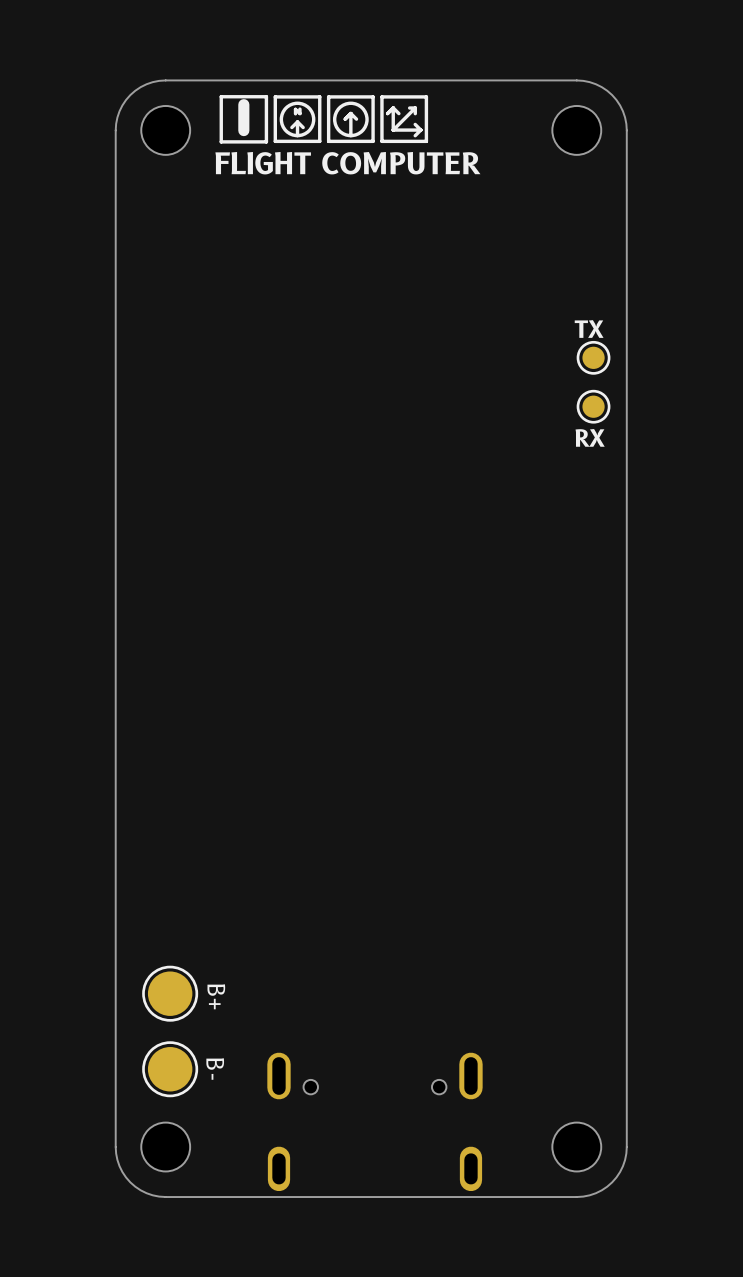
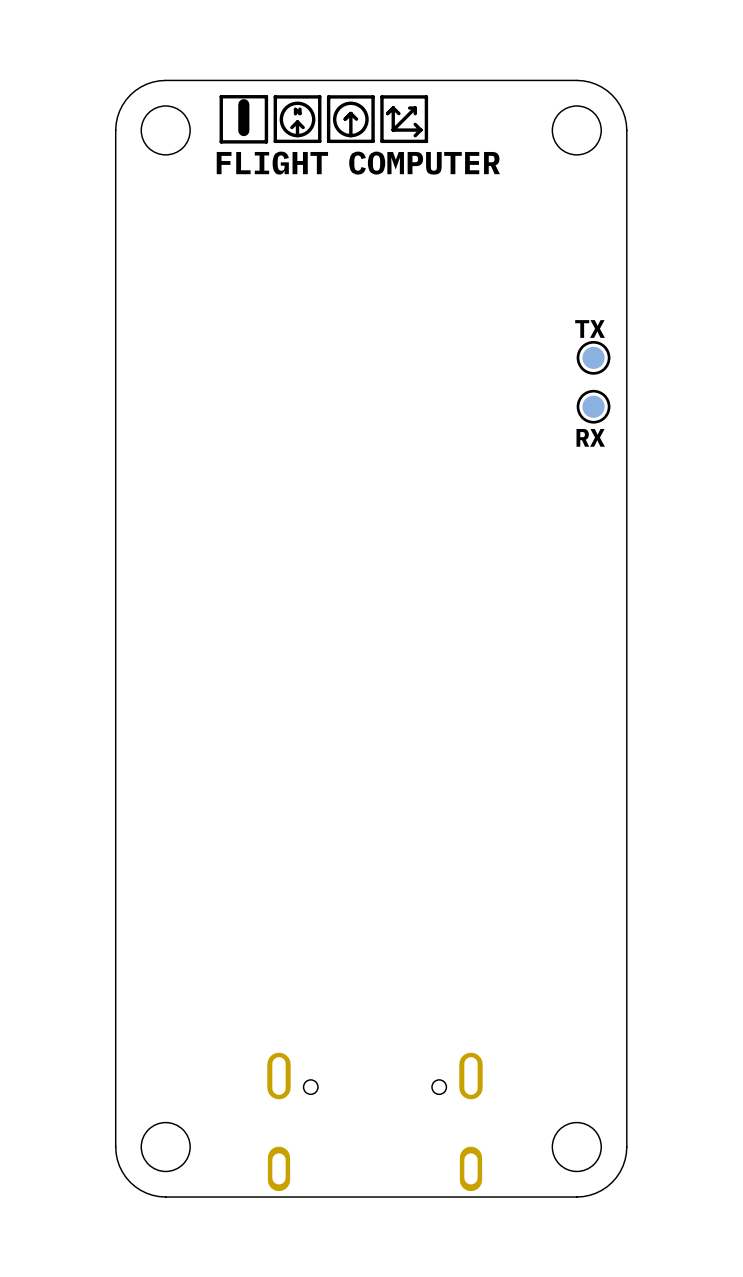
part: (170, 993) -> none
text: B+ (216, 996) -> none
part: (170, 1069) -> none
text: B- (215, 1069) -> none

